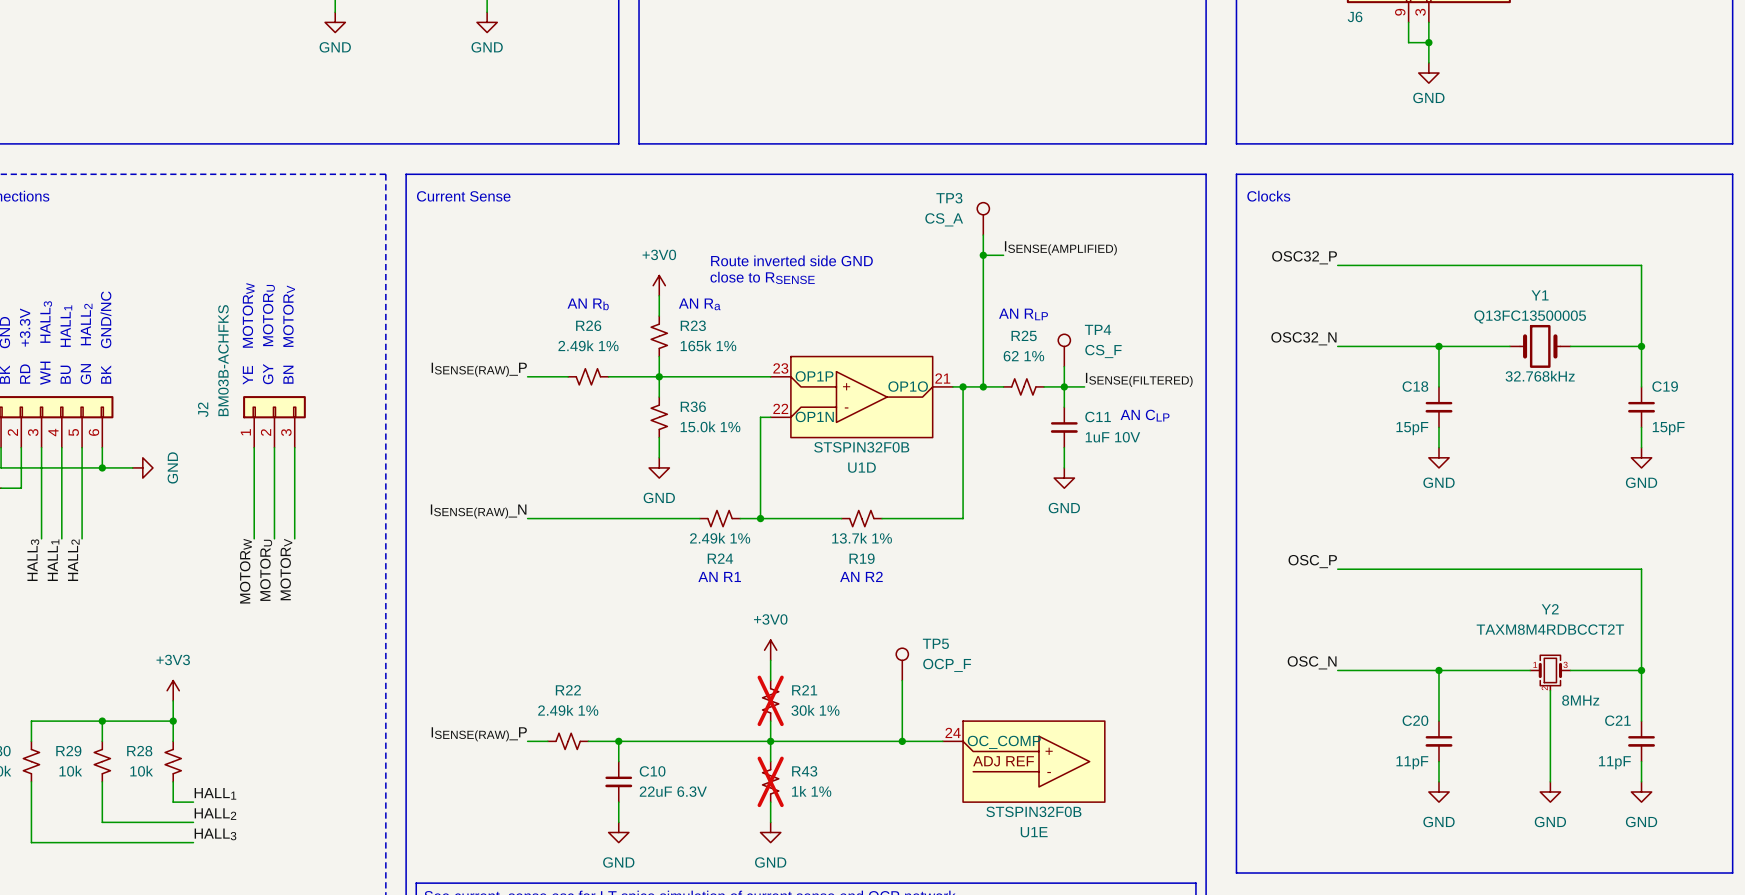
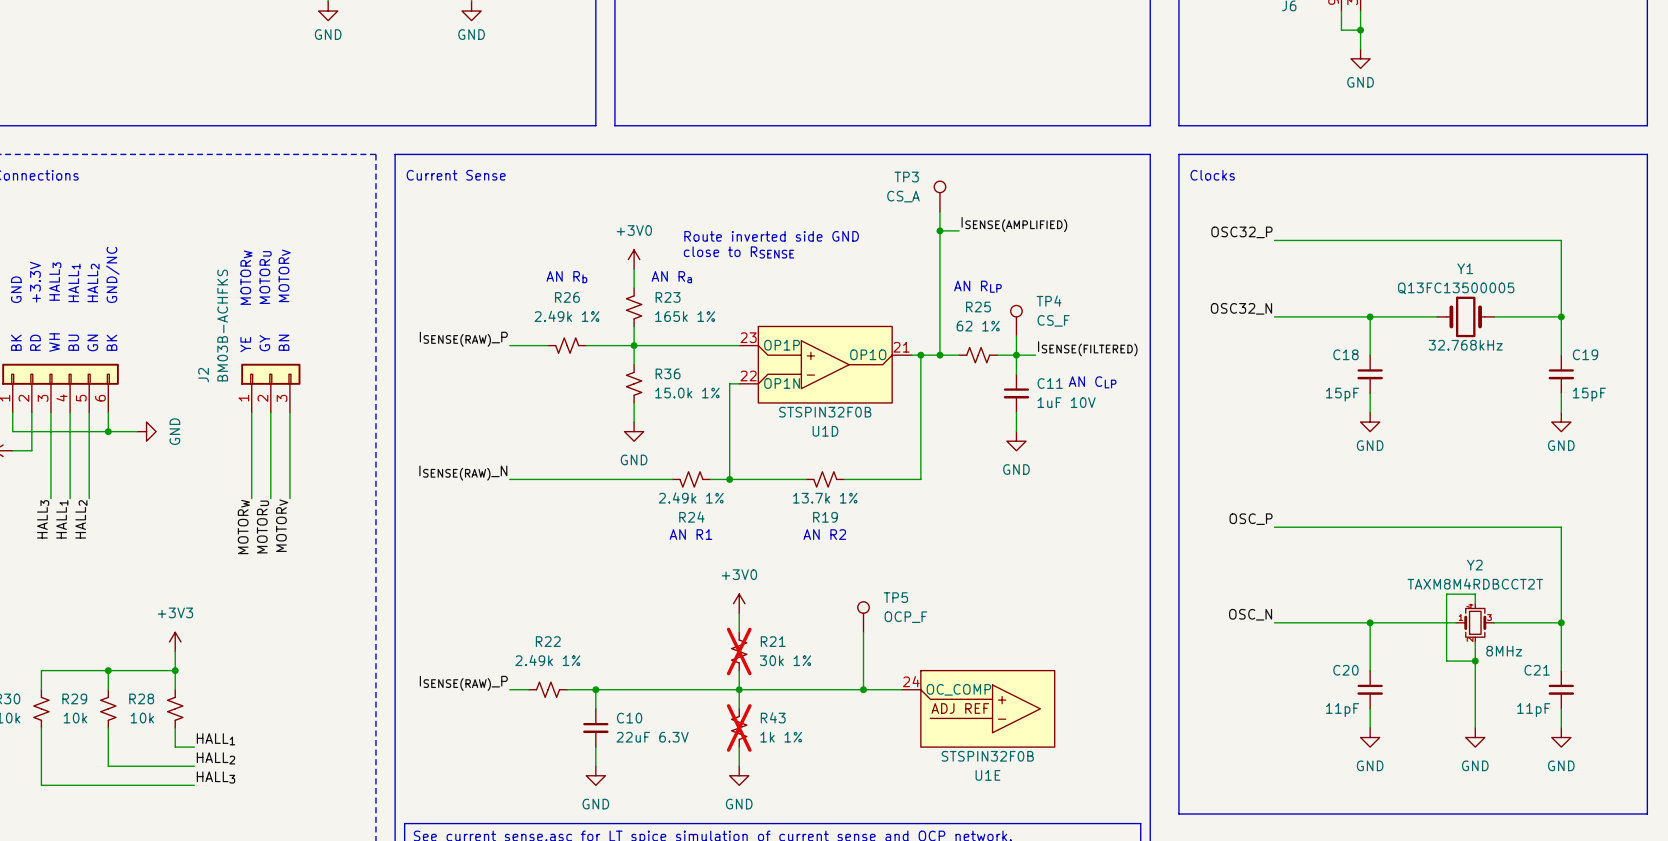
wire: none -> (1475, 603) (1475, 594) (1446, 594) (1446, 661) (1475, 661)
Y2 symbol: [1530, 655, 1571, 691] -> [1456, 603, 1495, 642]
junction: none -> (1475, 661)

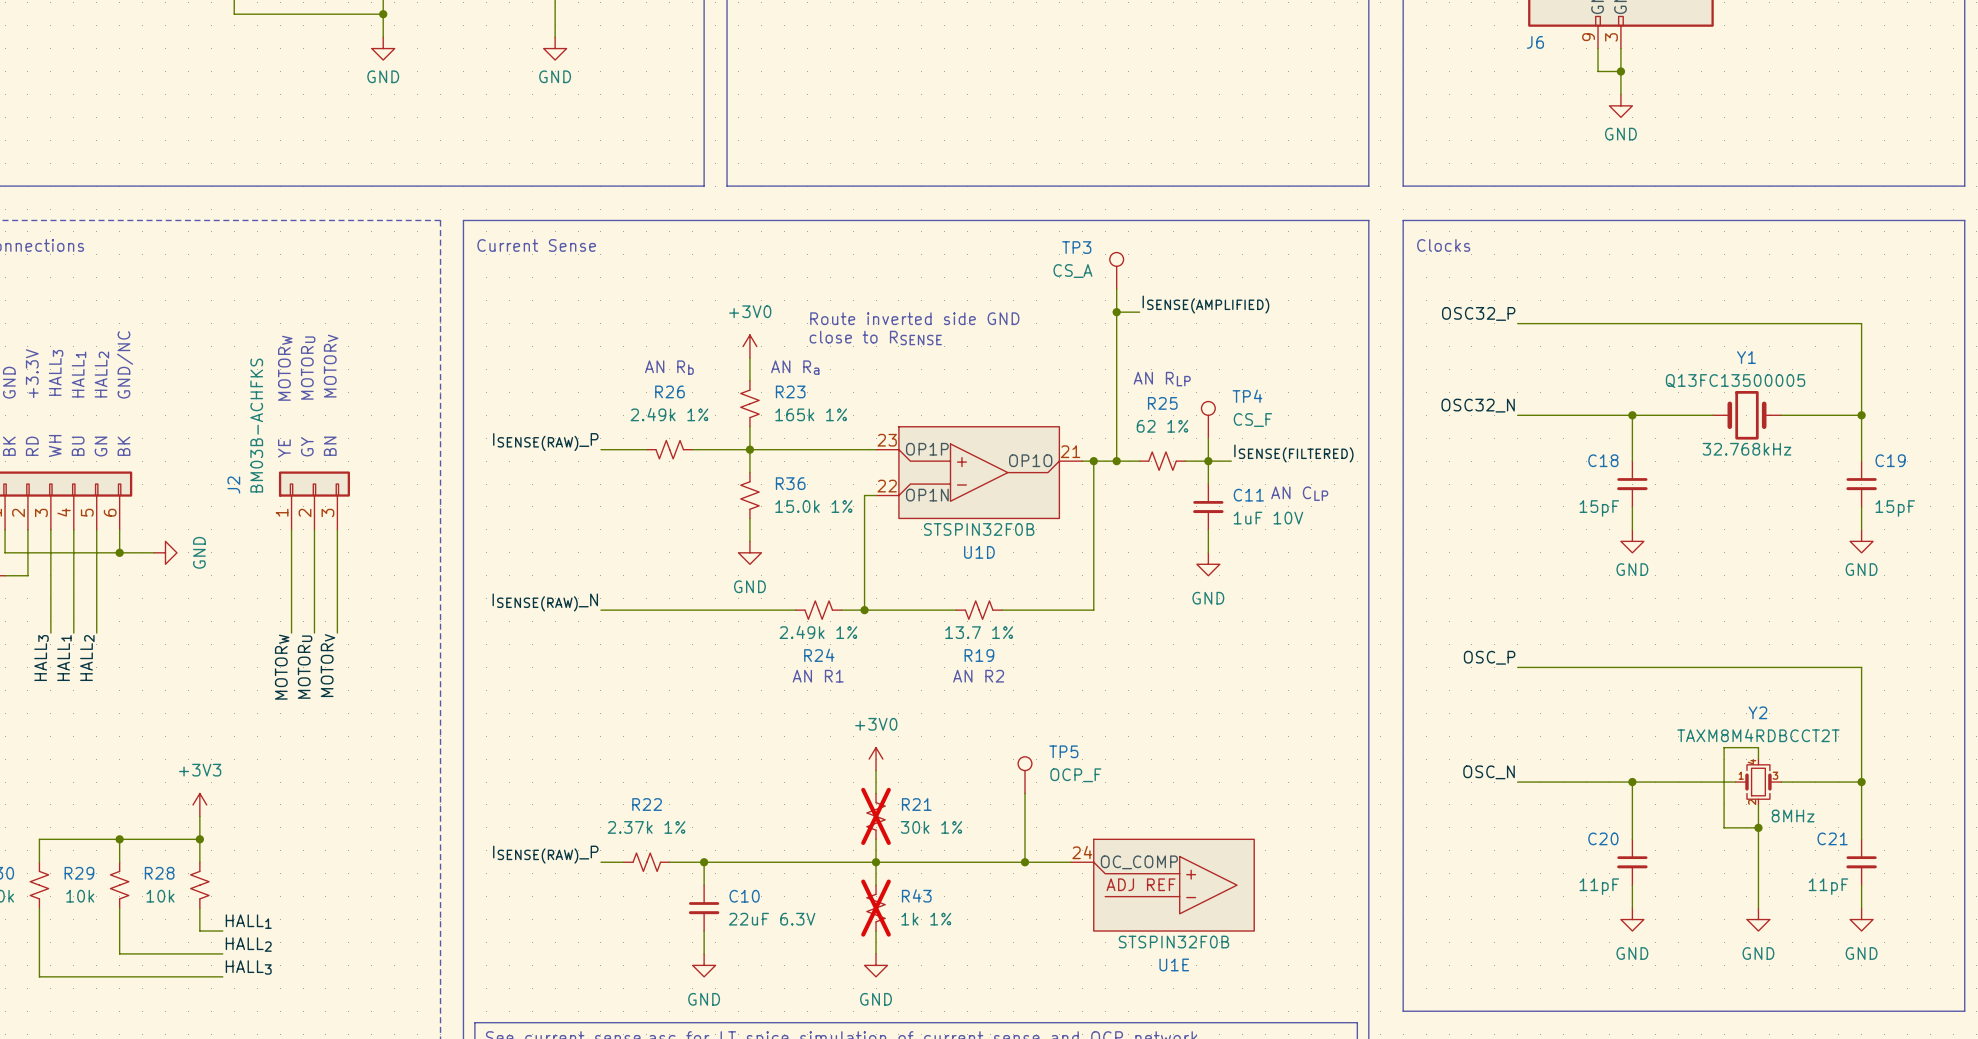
R19 value: 13.7k 1% (825, 498) -> 13.7 1% (979, 632)
R22 value: 2.49k 1% (547, 660) -> 2.37k 1% (646, 827)

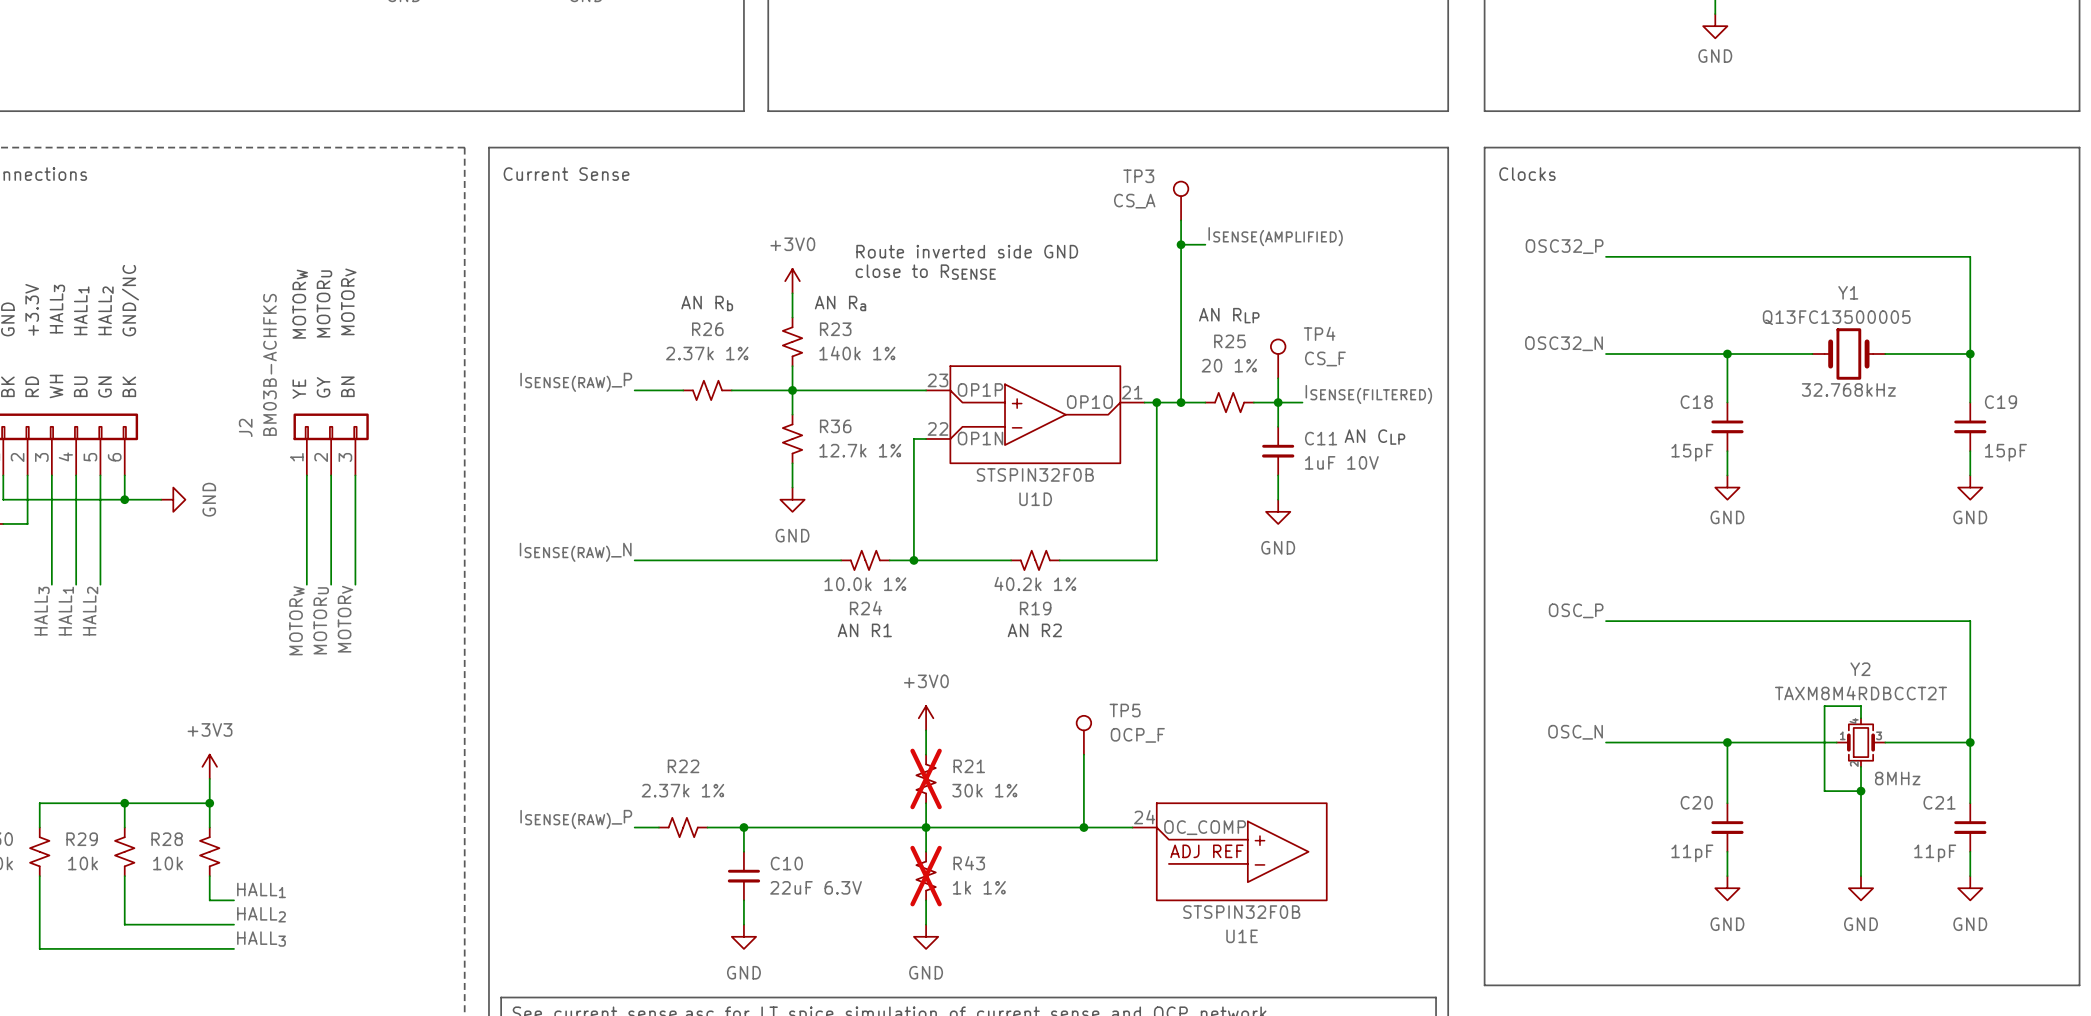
R26 value: 2.49k 1% (669, 414) -> 2.37k 1% (707, 353)
R23 value: 165k 1% (811, 414) -> 140k 1% (857, 353)
R25 value: 62 1% (1162, 426) -> 20 1% (1229, 365)
R36 value: 15.0k 1% (813, 506) -> 12.7k 1% (860, 450)
R24 value: 2.49k 1% (818, 632) -> 10.0k 1% (865, 584)
R19 value: 13.7 1% (979, 632) -> 40.2k 1% (1035, 583)

